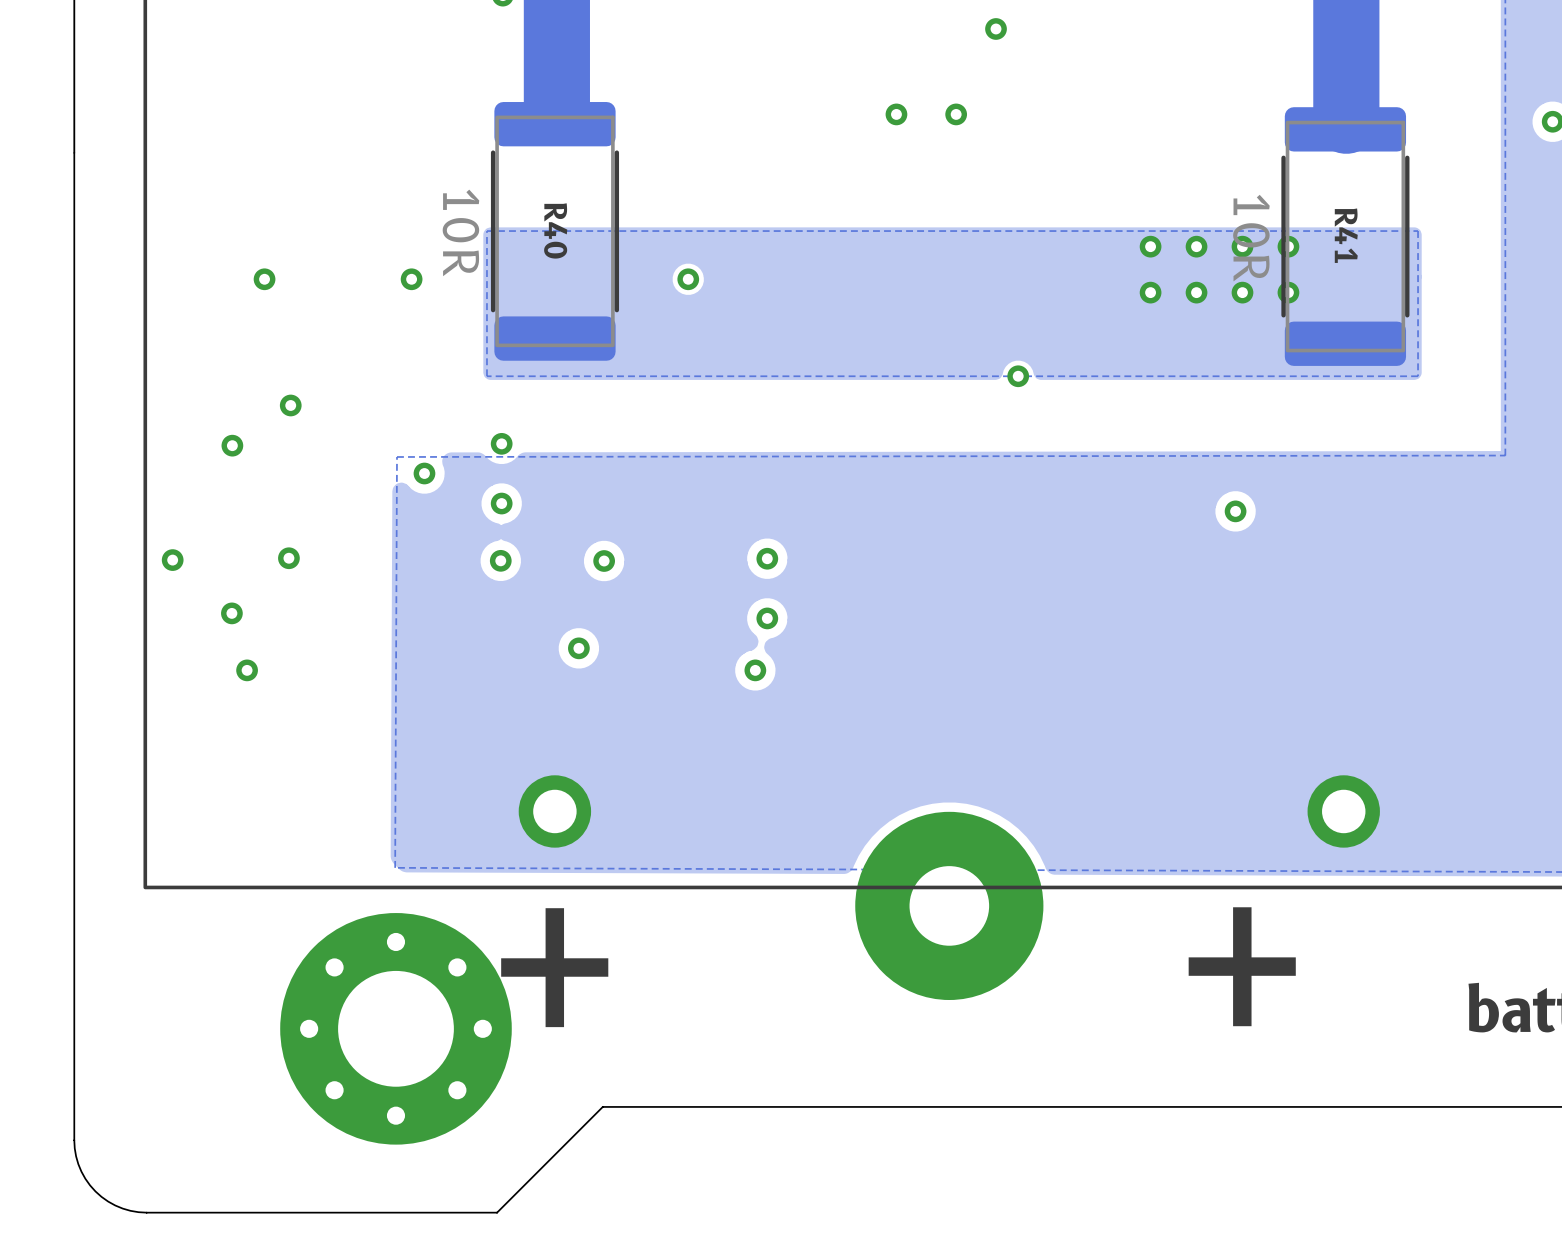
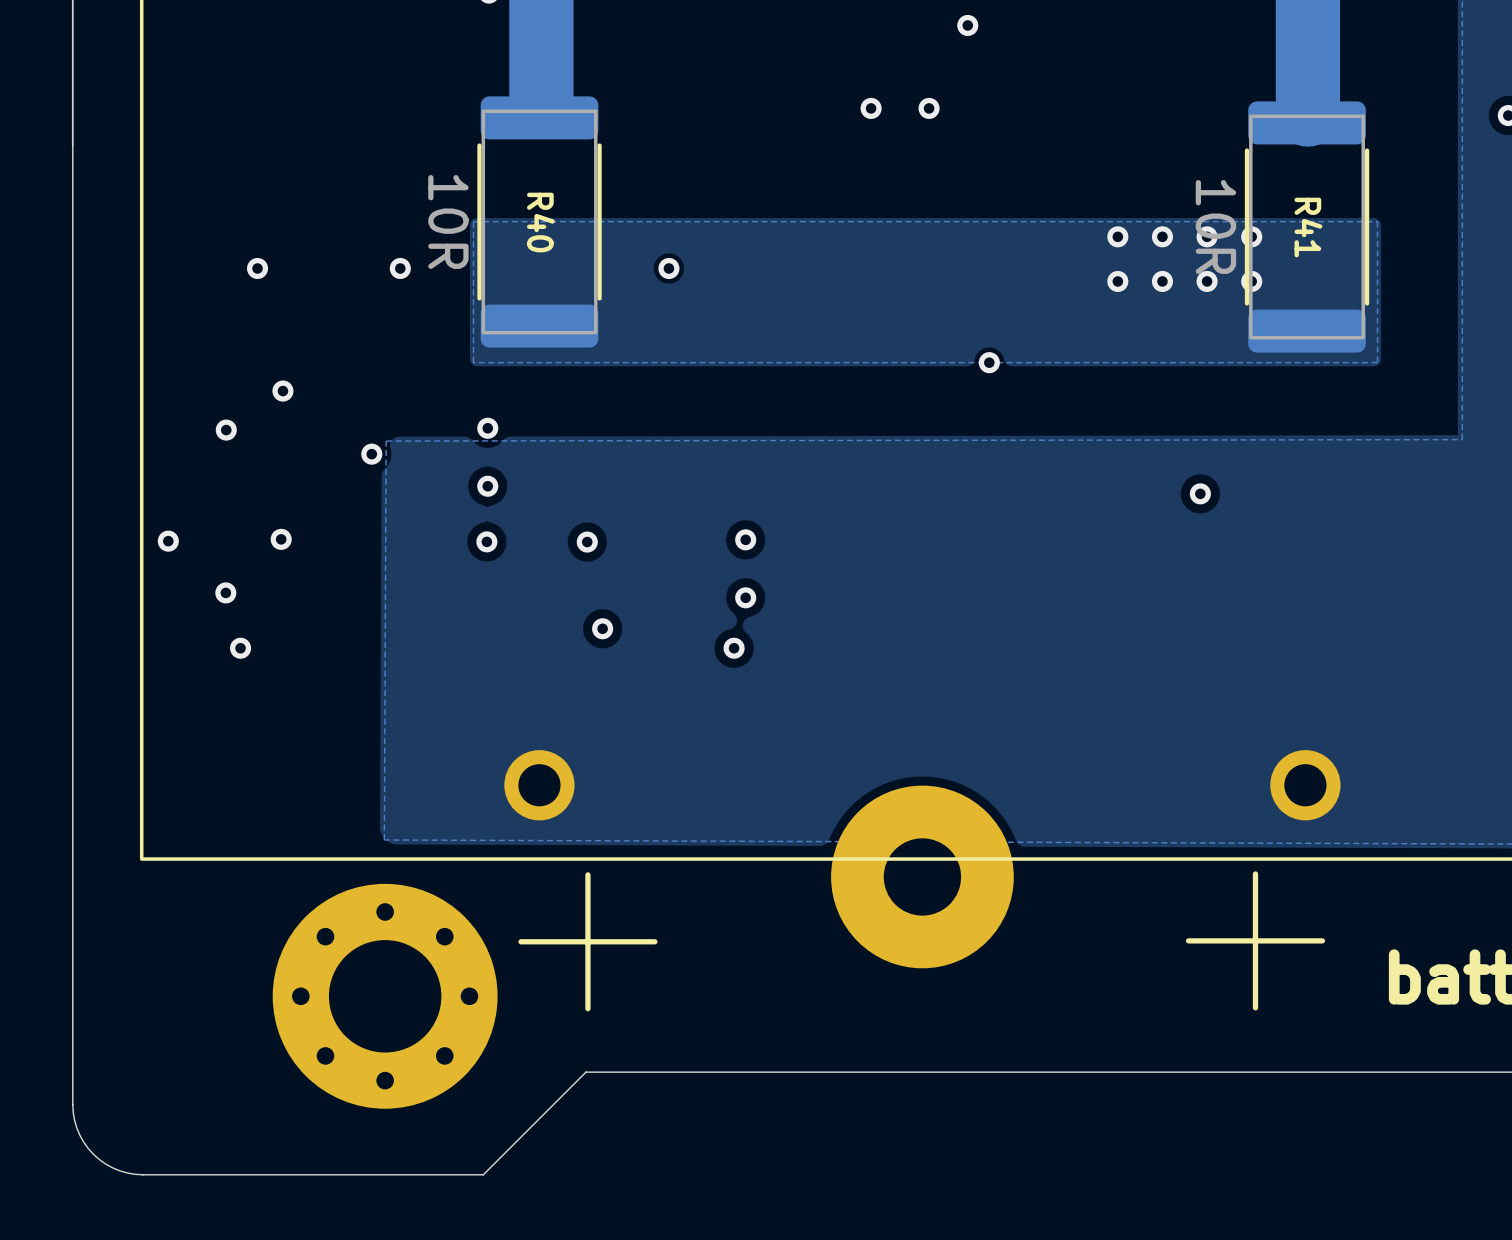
via position: (424, 473) -> (371, 454)
via position: (578, 648) -> (602, 628)

